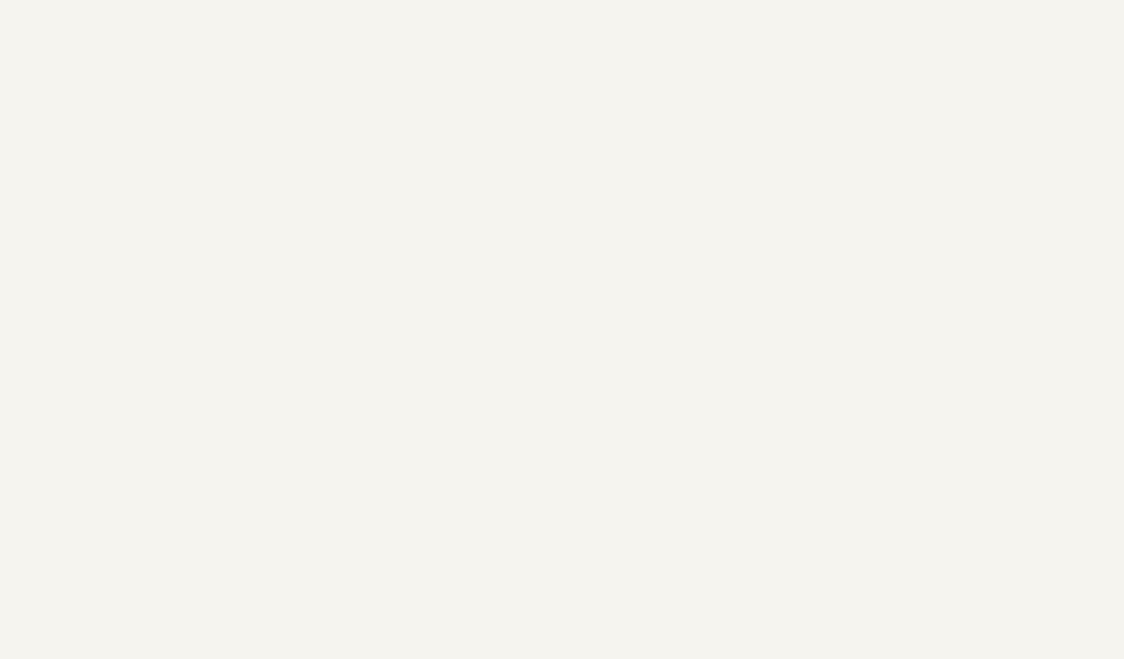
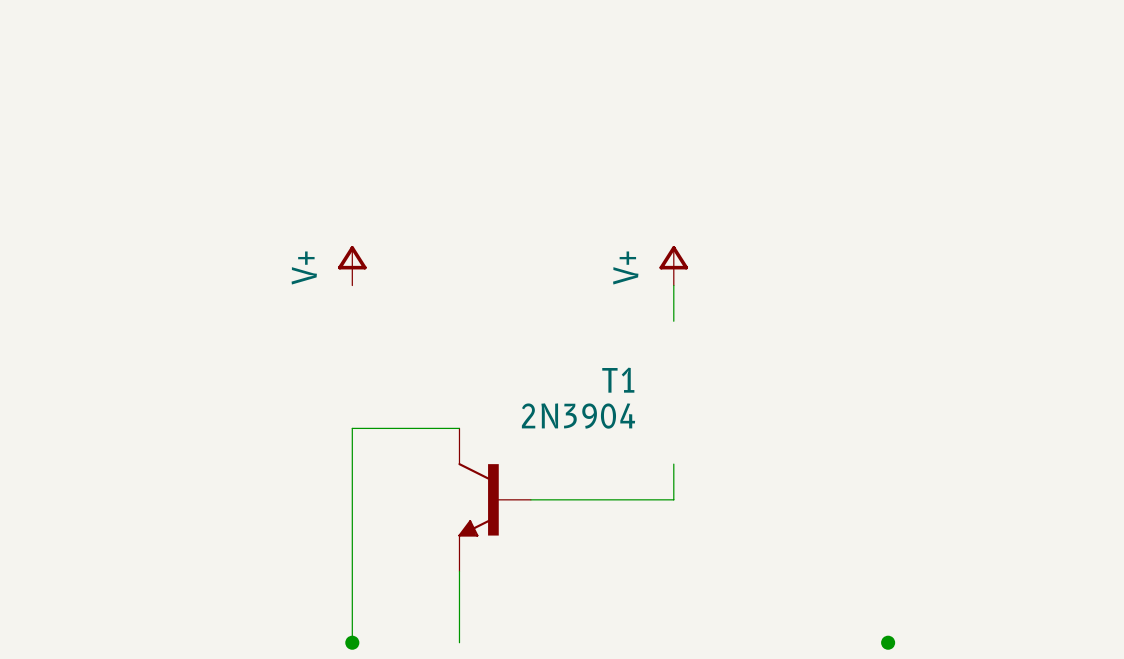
power symbol: none -> V+ (352, 265)
power symbol: none -> V+ (673, 265)
wire: none -> (673, 285) (673, 321)
wire: none -> (459, 428) (352, 428) (352, 642)
wire: none -> (673, 464) (673, 499) (530, 499)
T1: none -> 2N3904 (494, 499)
wire: none -> (459, 571) (459, 642)
junction: none -> (352, 642)
junction: none -> (888, 642)

